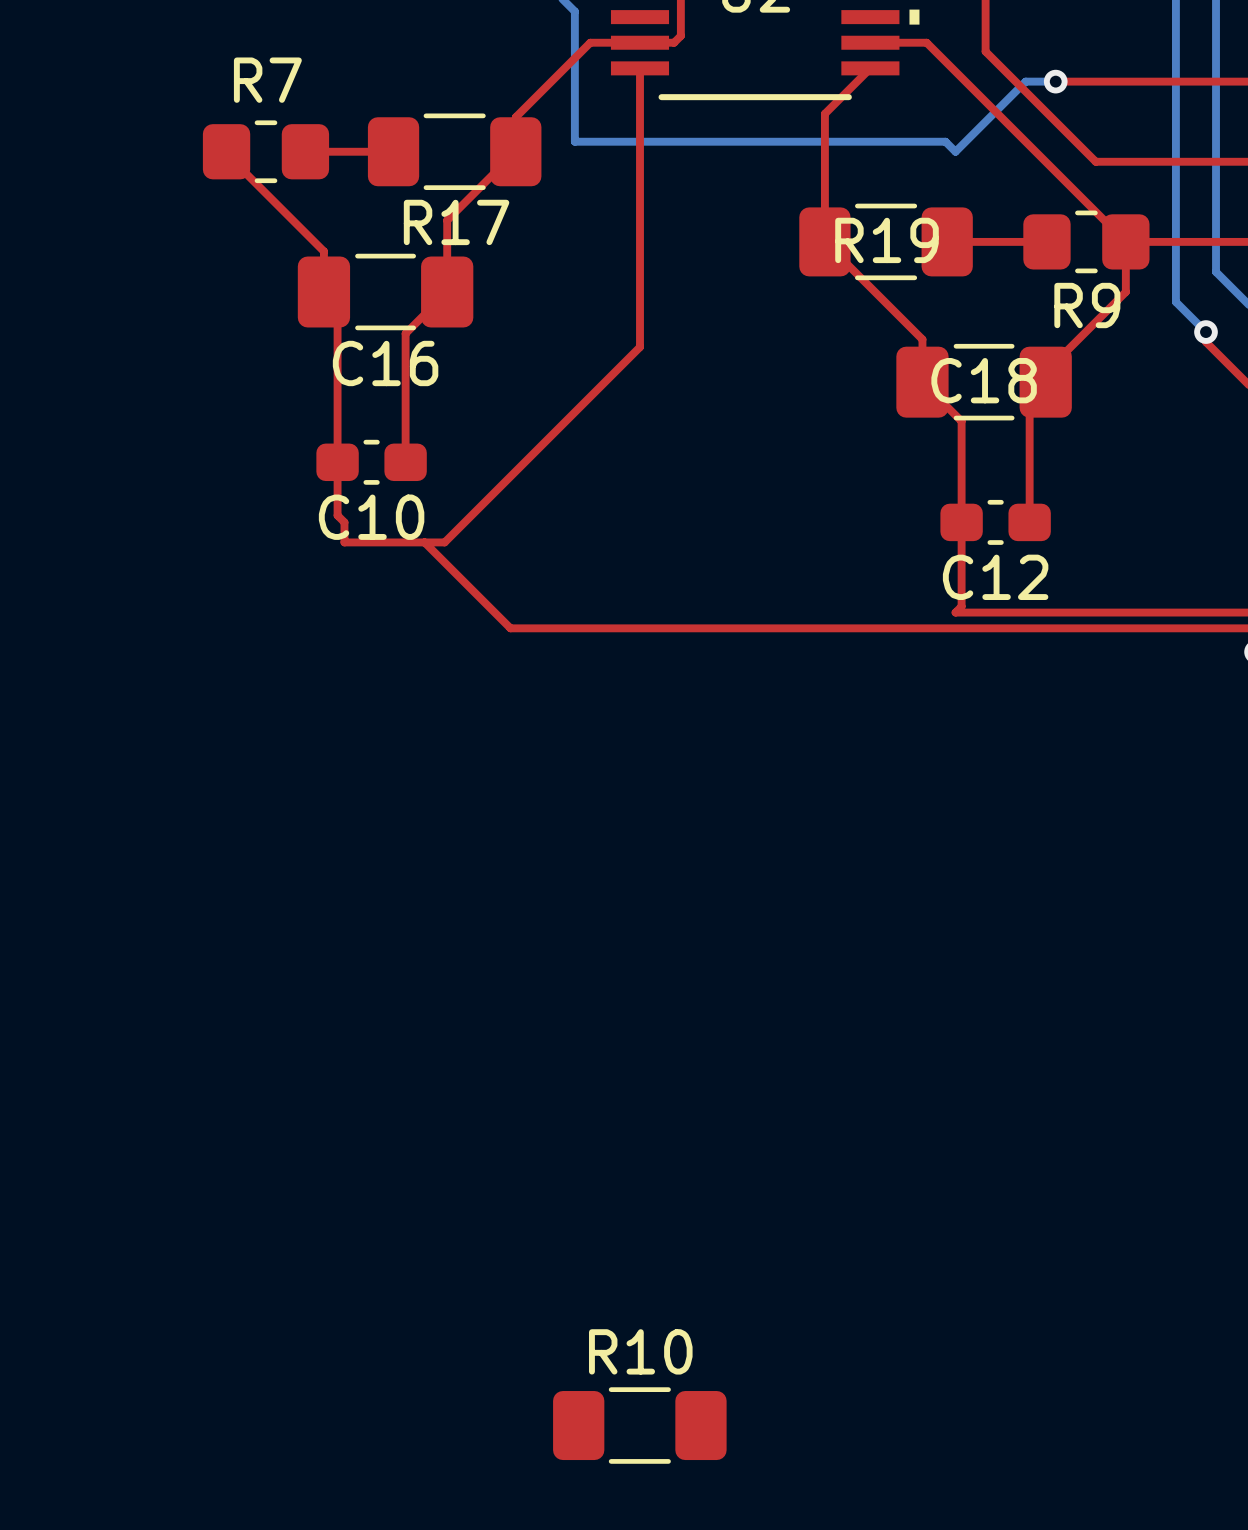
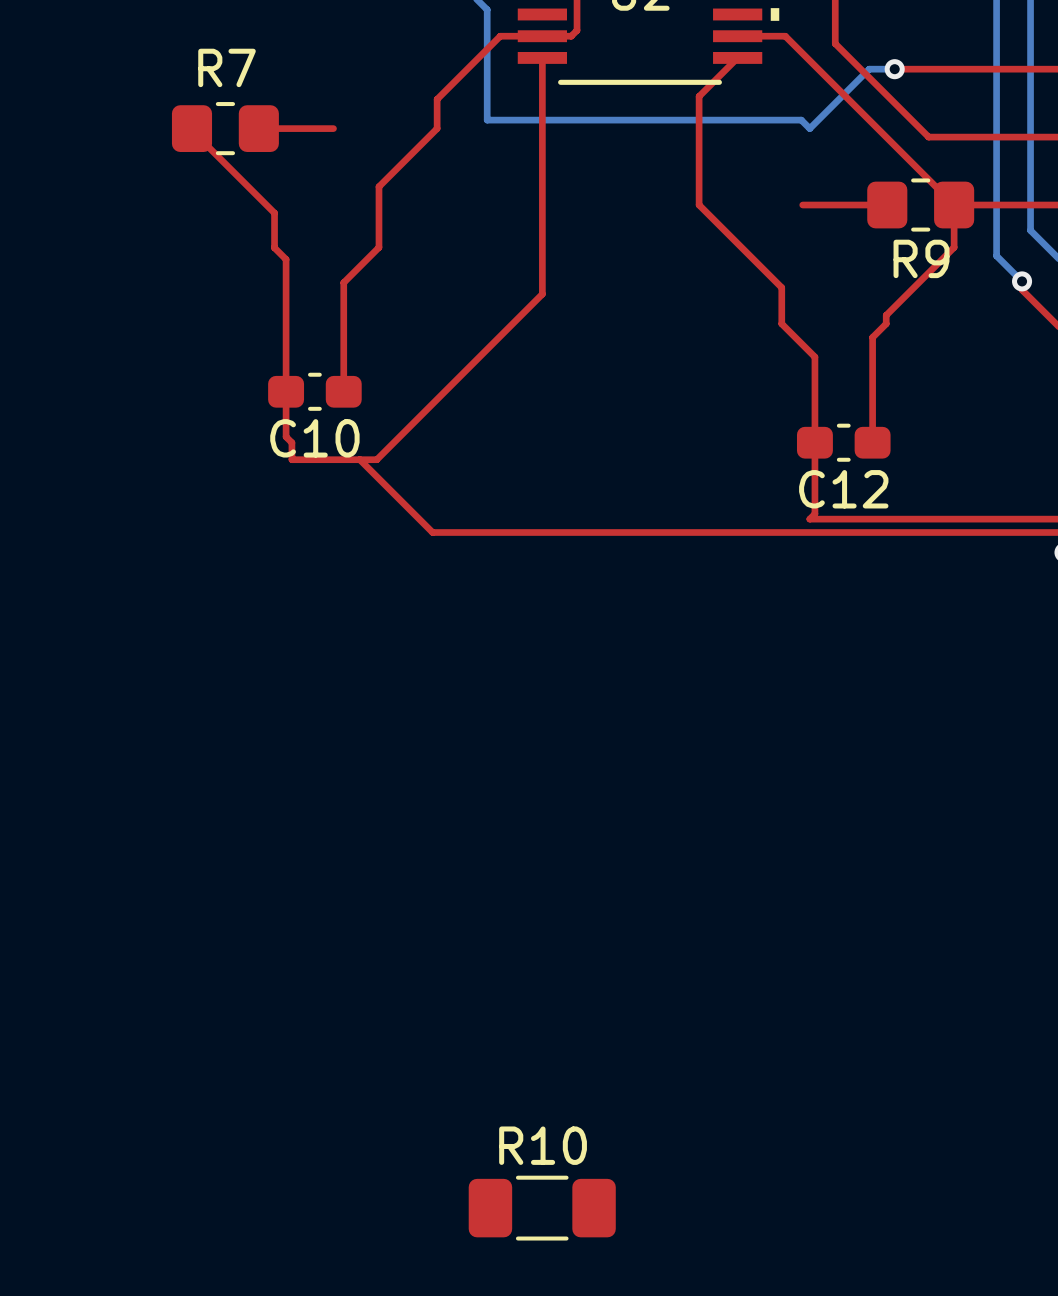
R17: (454, 151) -> none
R19: (886, 241) -> none
C16: (385, 291) -> none
C18: (984, 382) -> none

